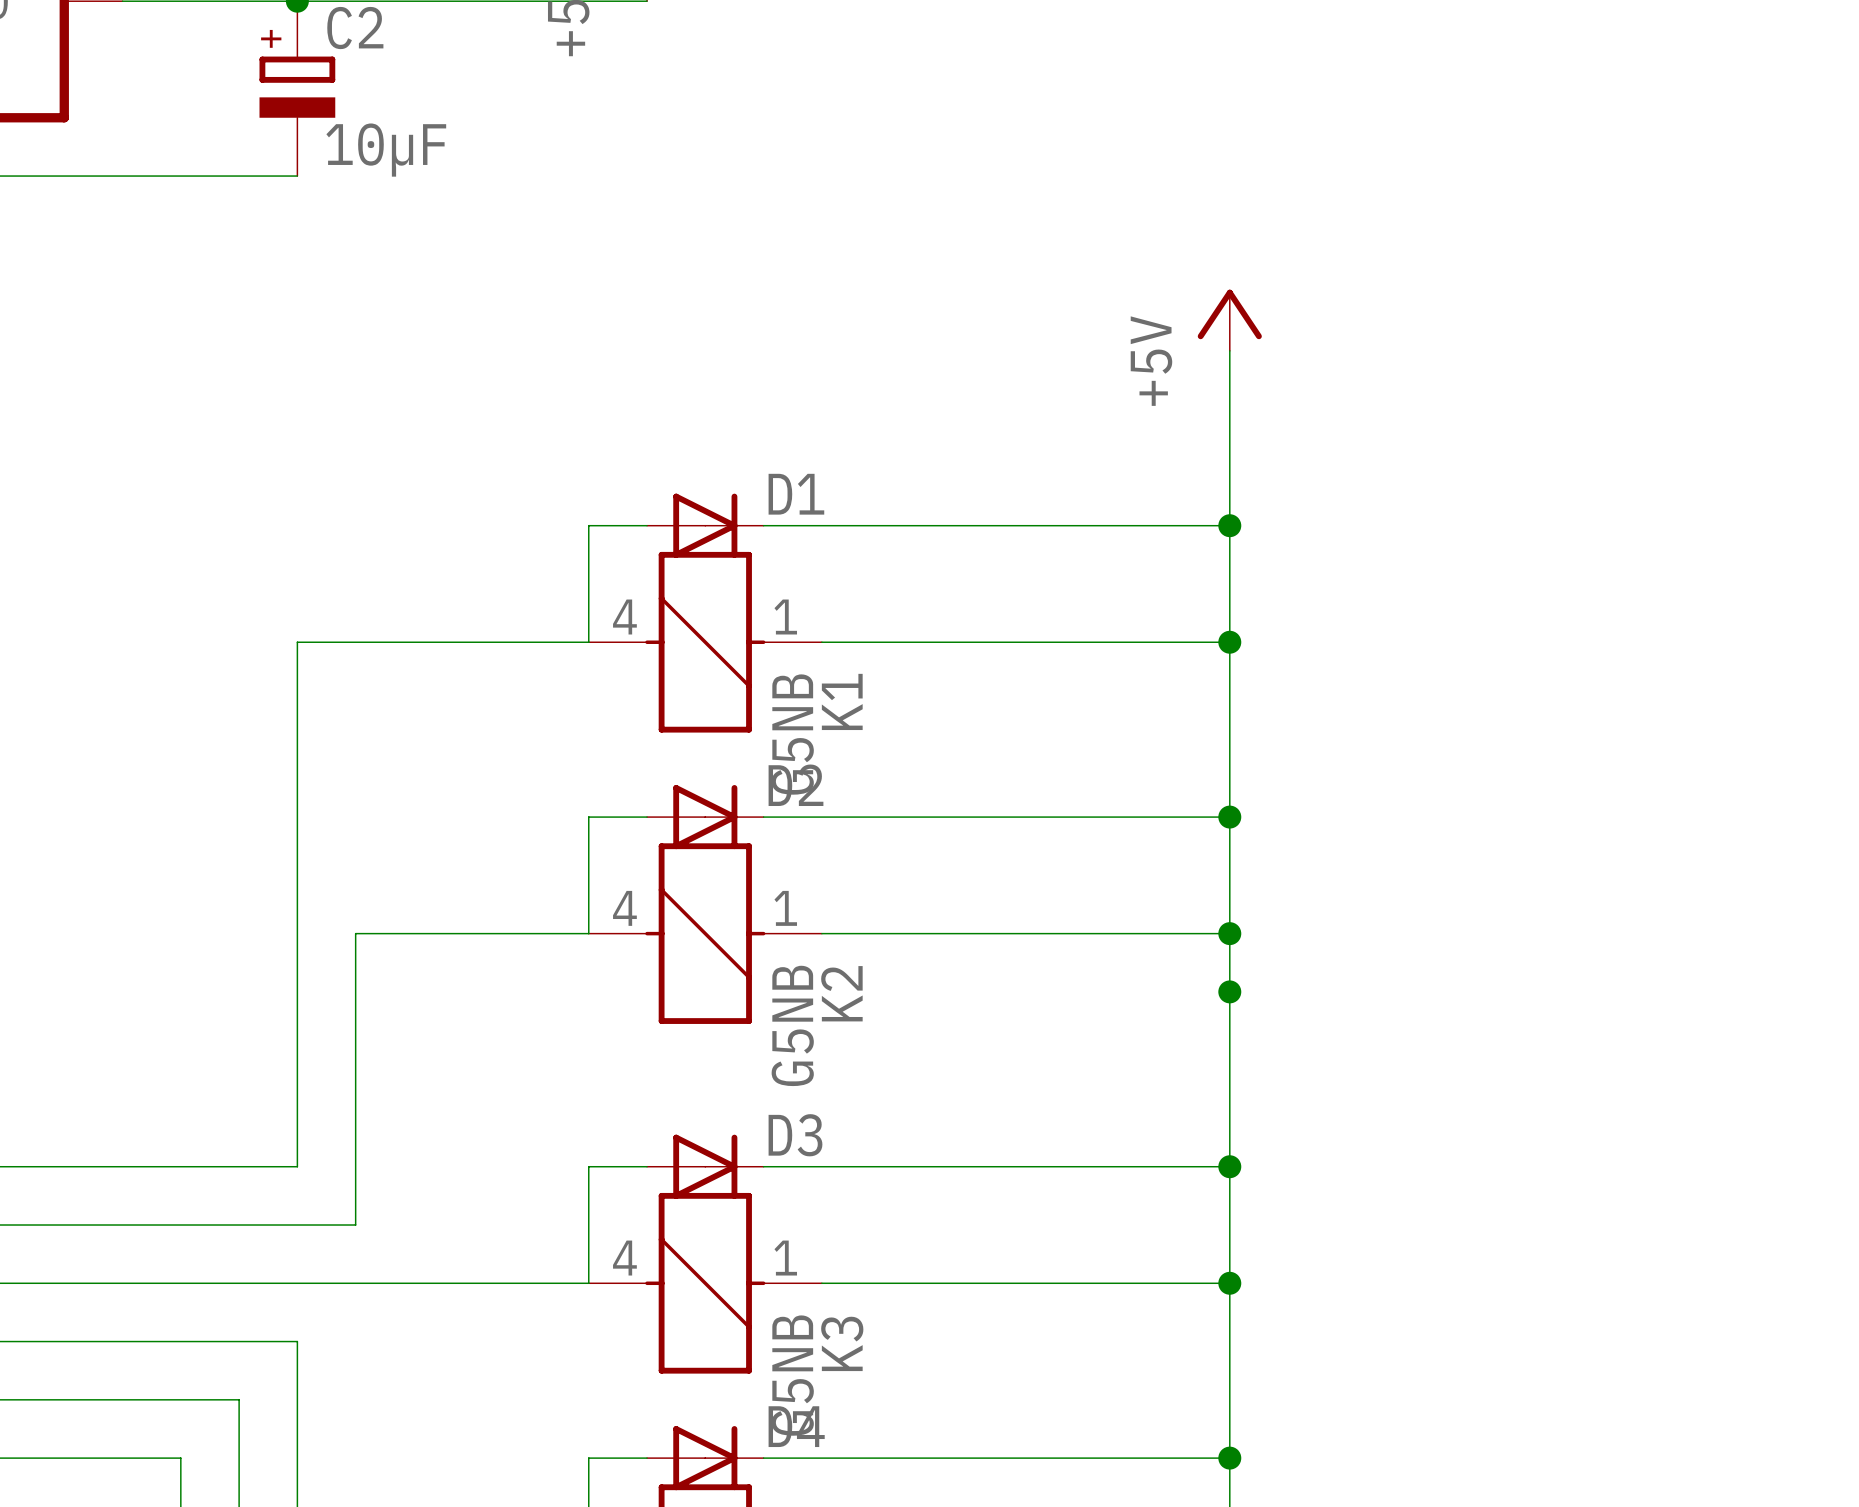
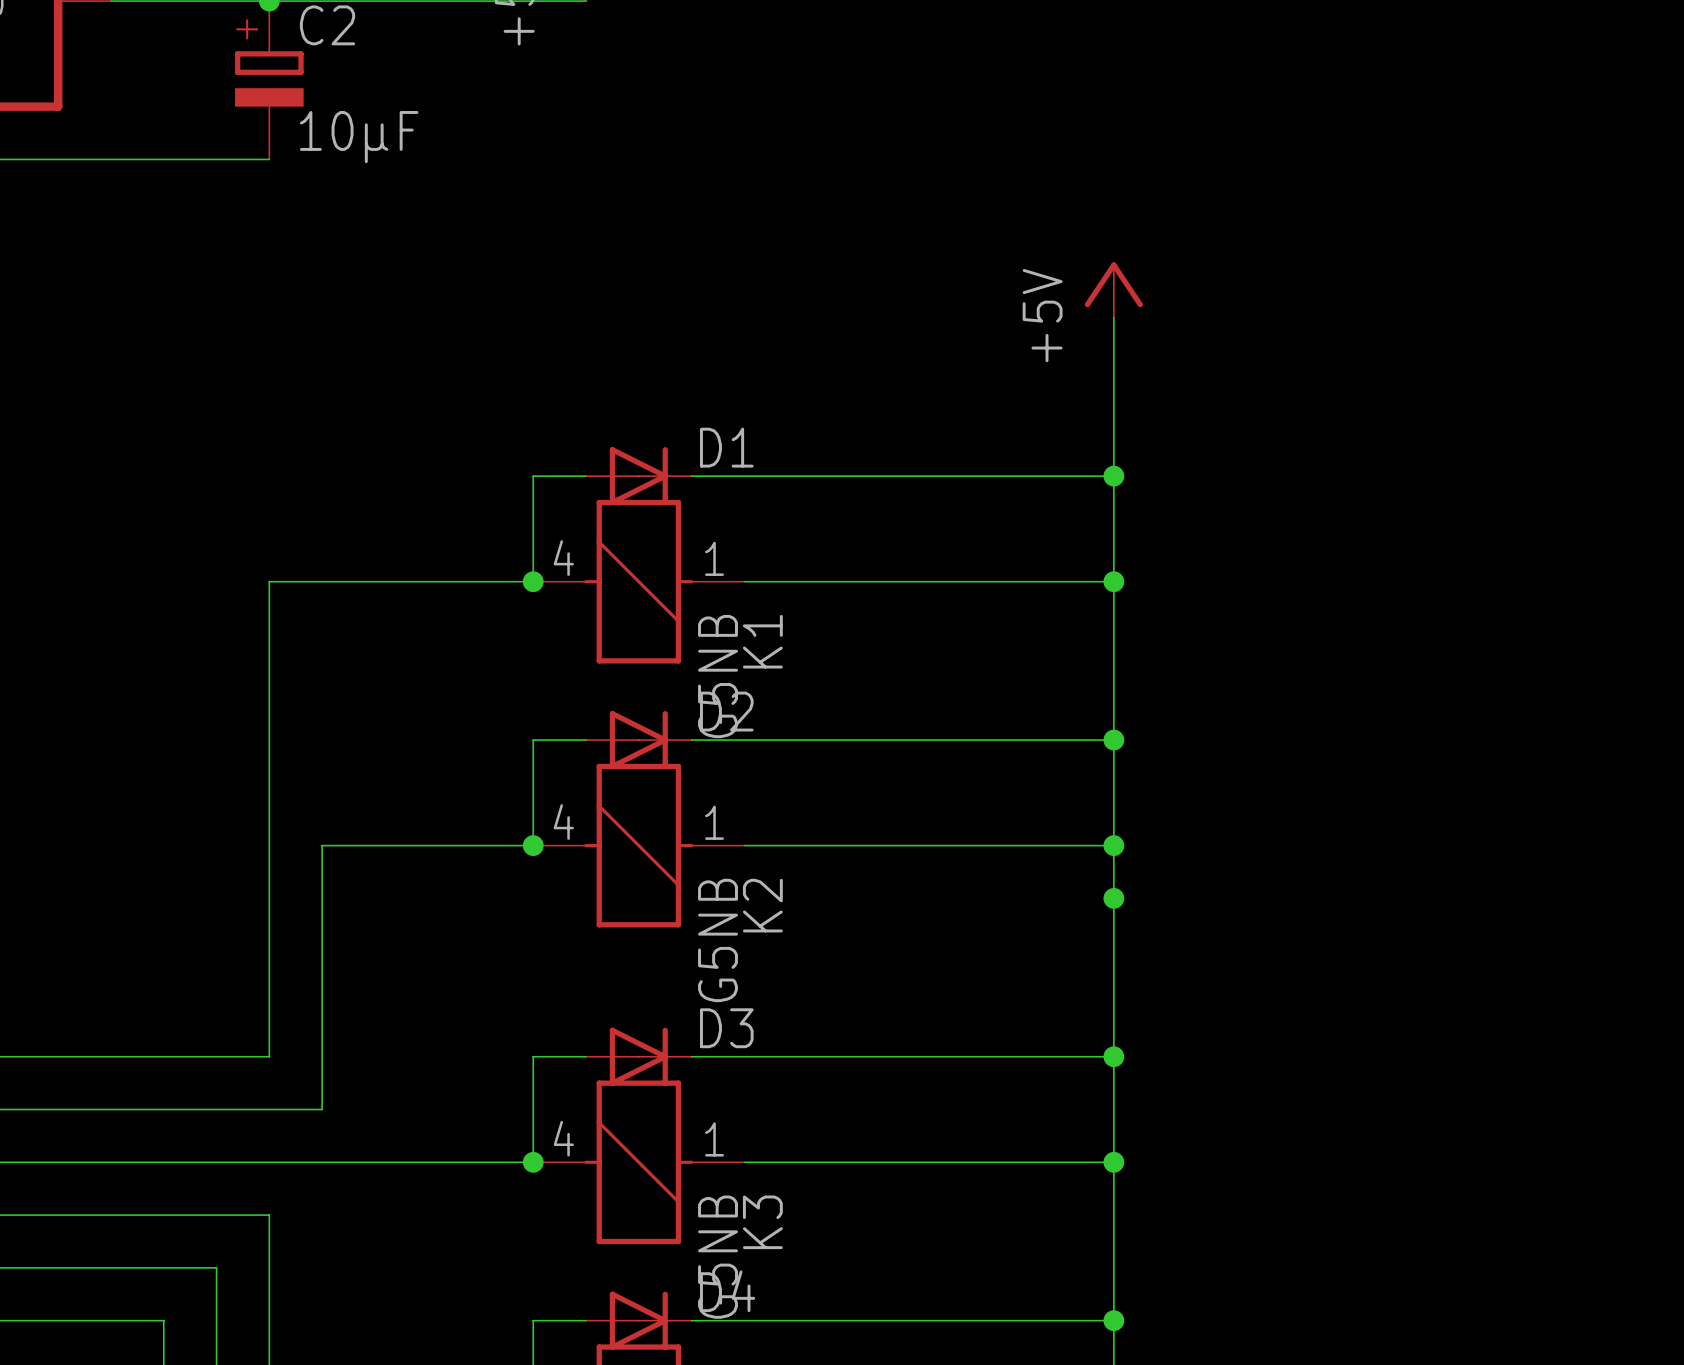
junction: none -> (533, 581)
junction: none -> (533, 845)
junction: none -> (533, 1162)

